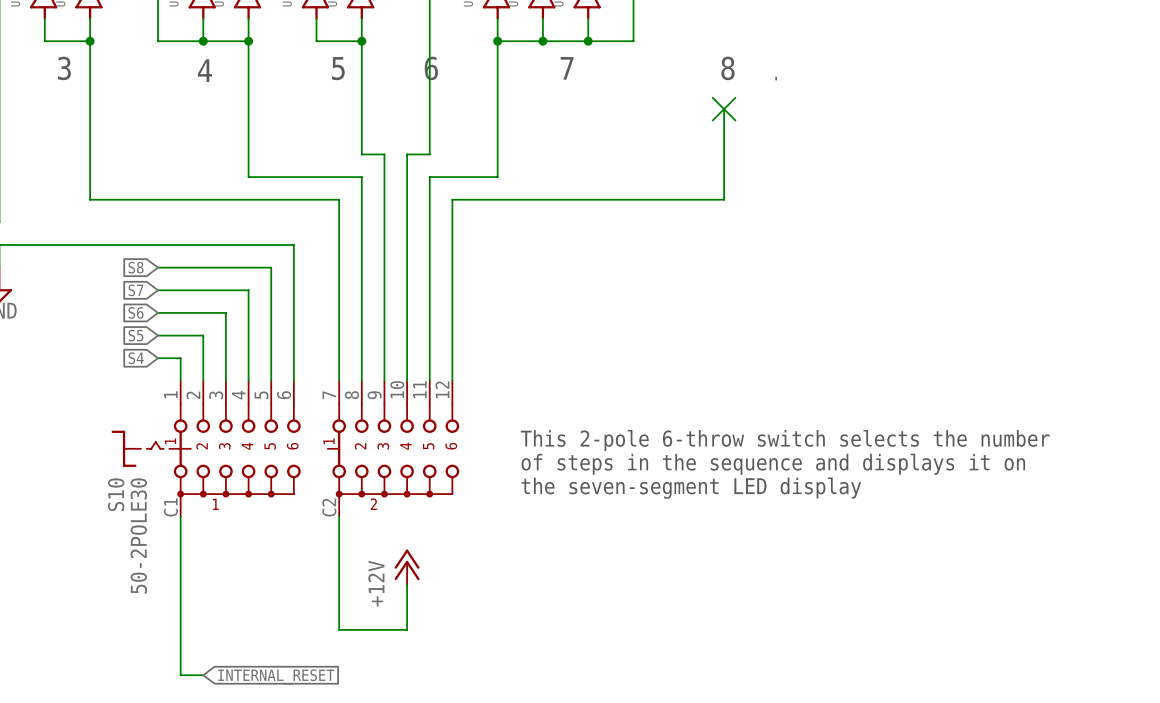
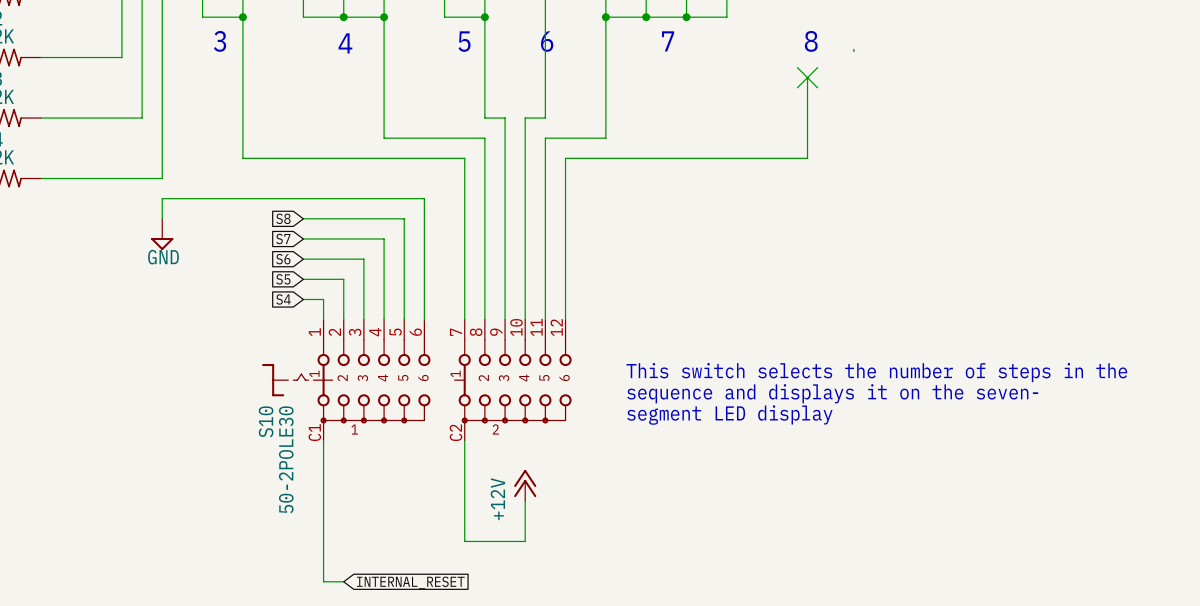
text: This 2-pole 6-throw switch selects the number (785, 440) -> This switch selects the number of steps in the (876, 372)
text: of steps in the sequence and displays it on (773, 464) -> sequence and displays it on the seven- (832, 393)
text: the seven-segment LED display (691, 488) -> segment LED display (729, 415)

